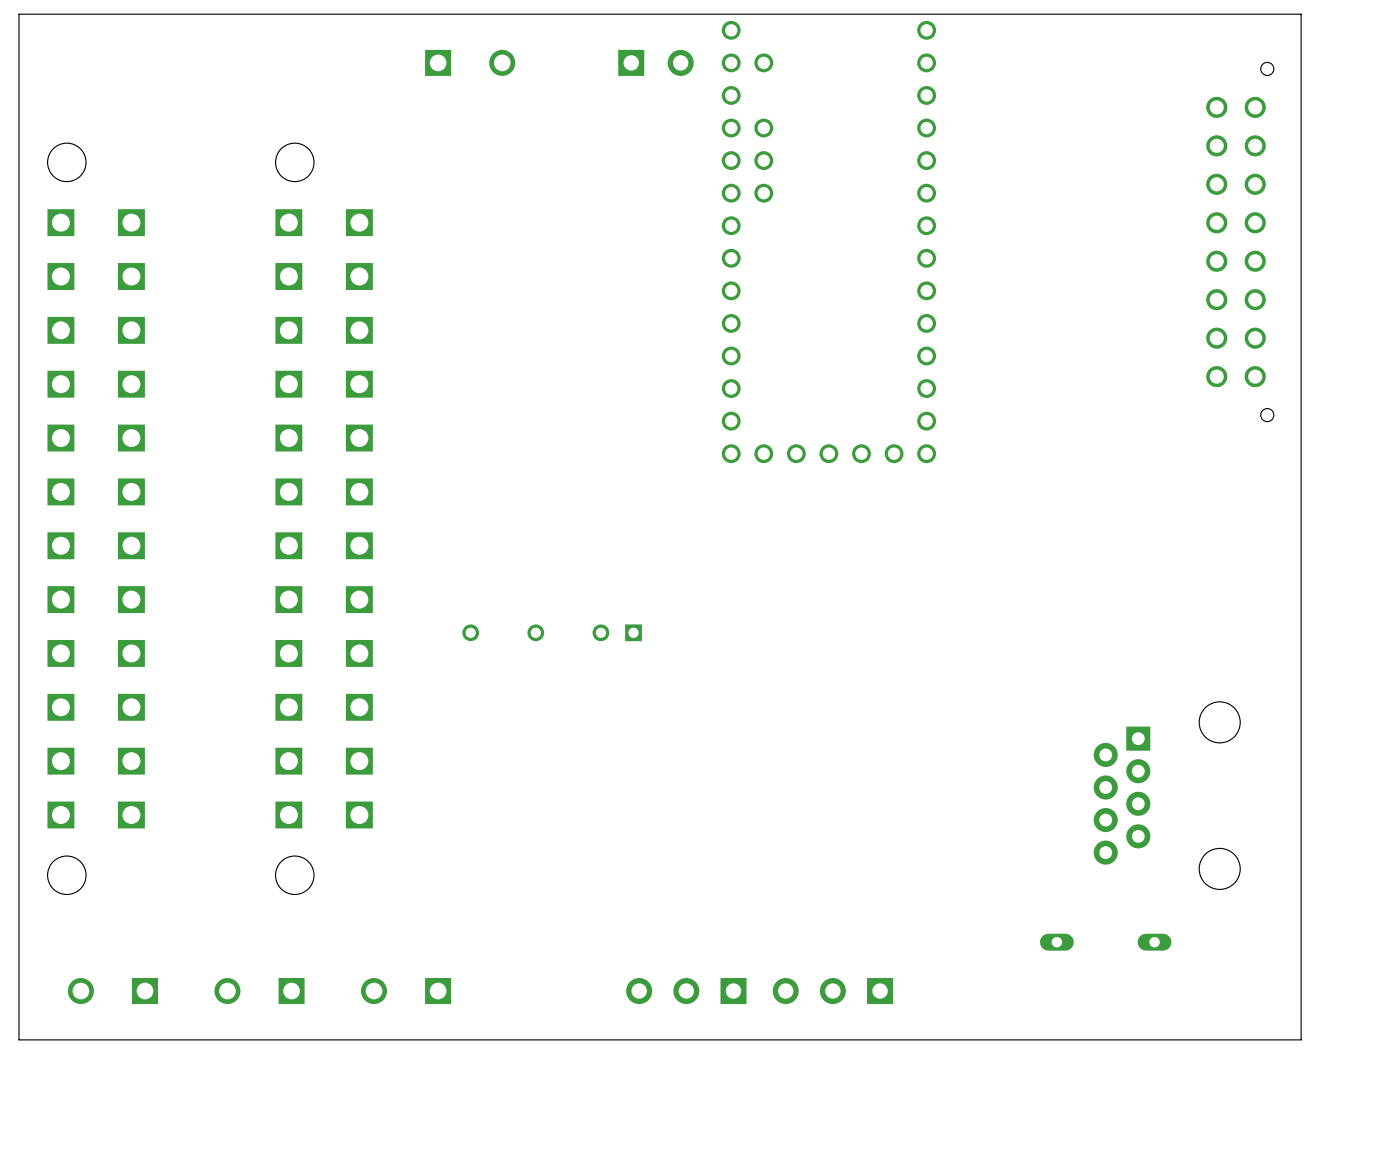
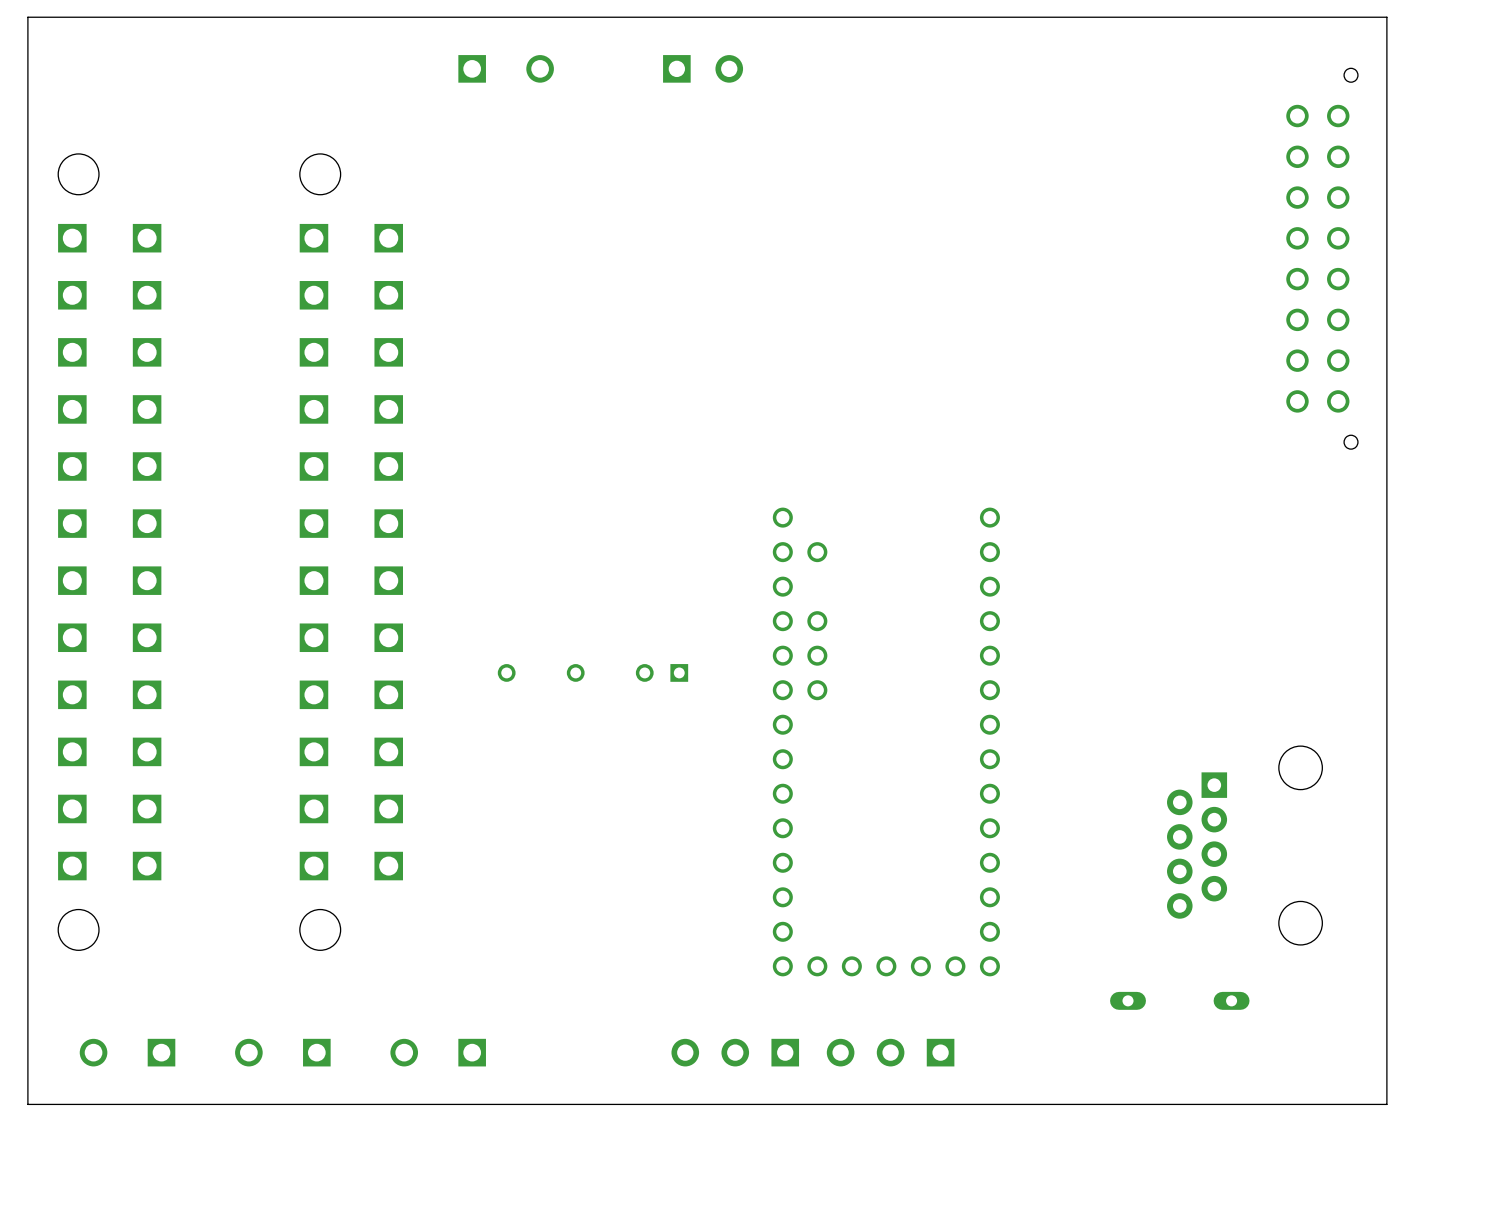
part: (828, 242) -> none
part: none -> (886, 741)

